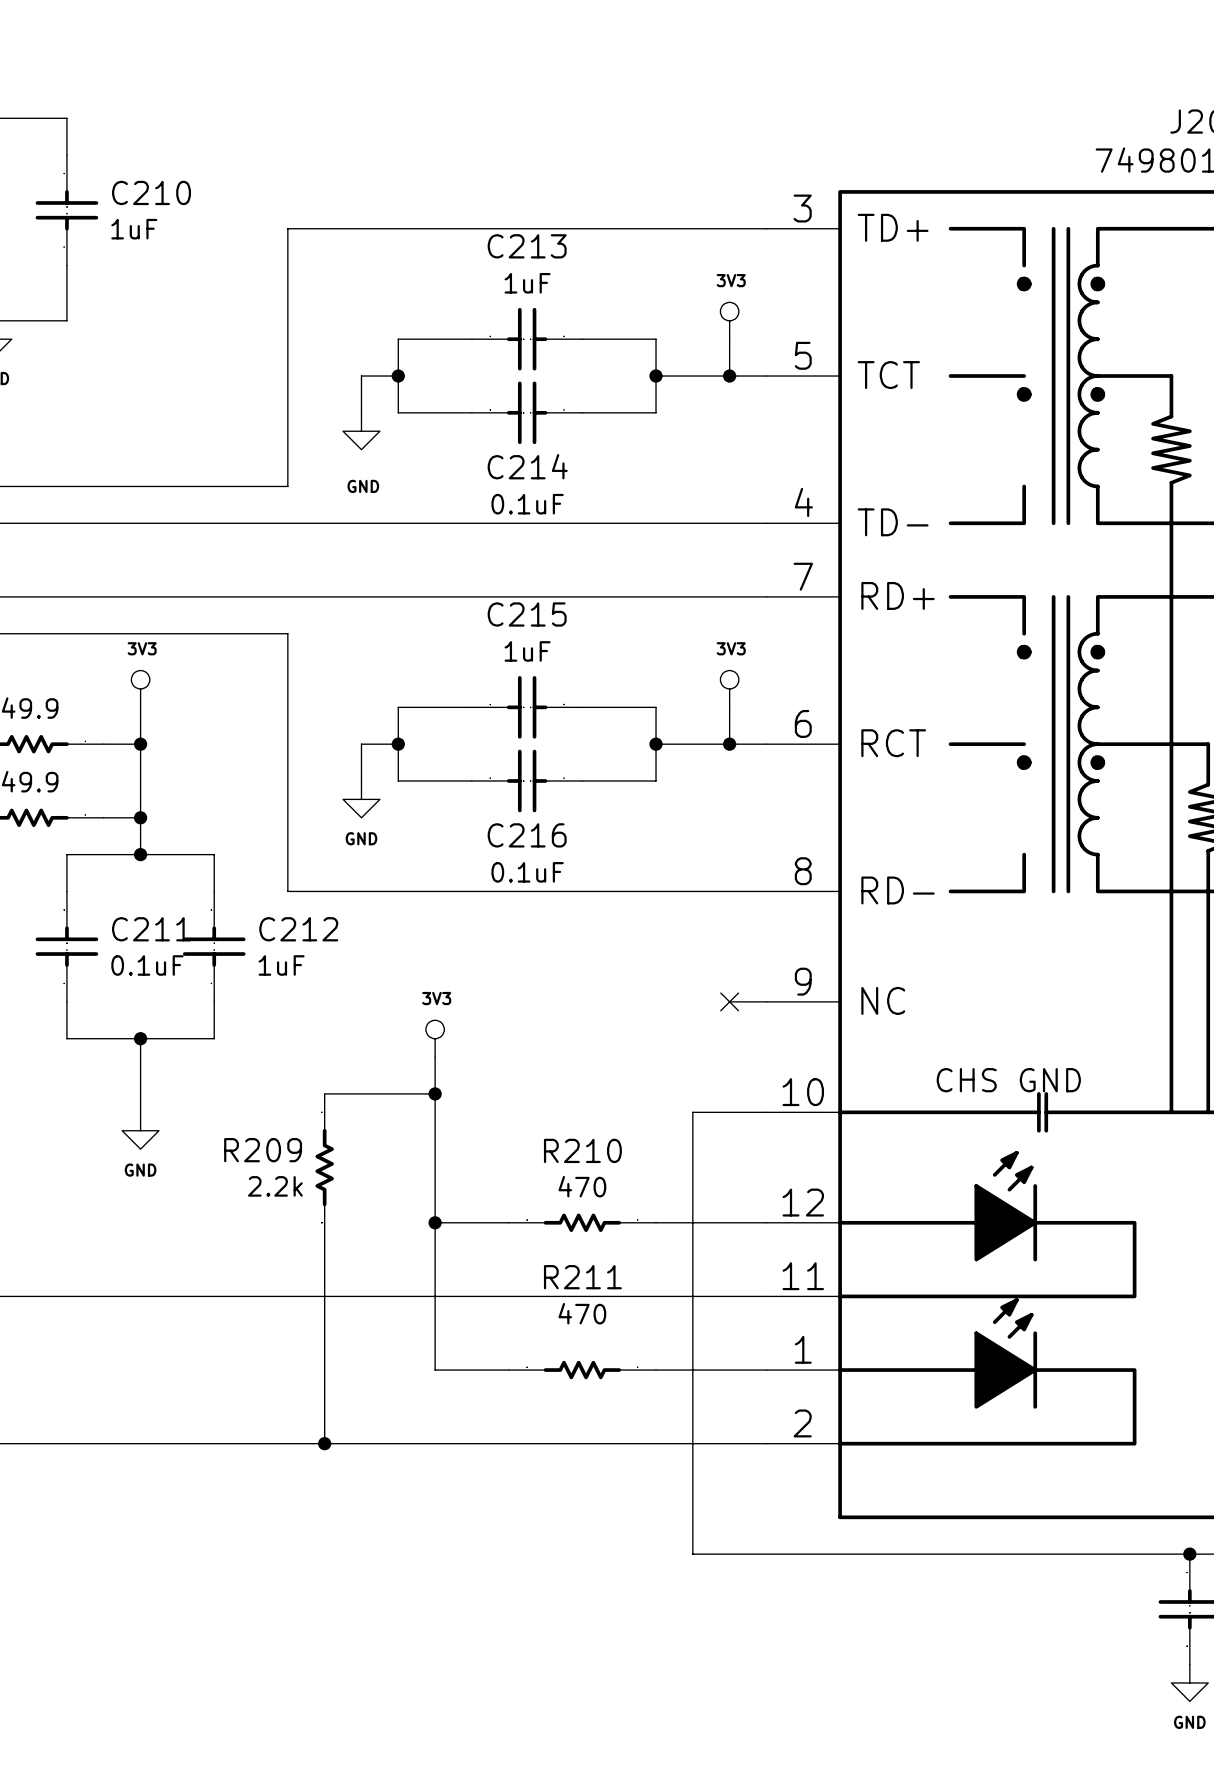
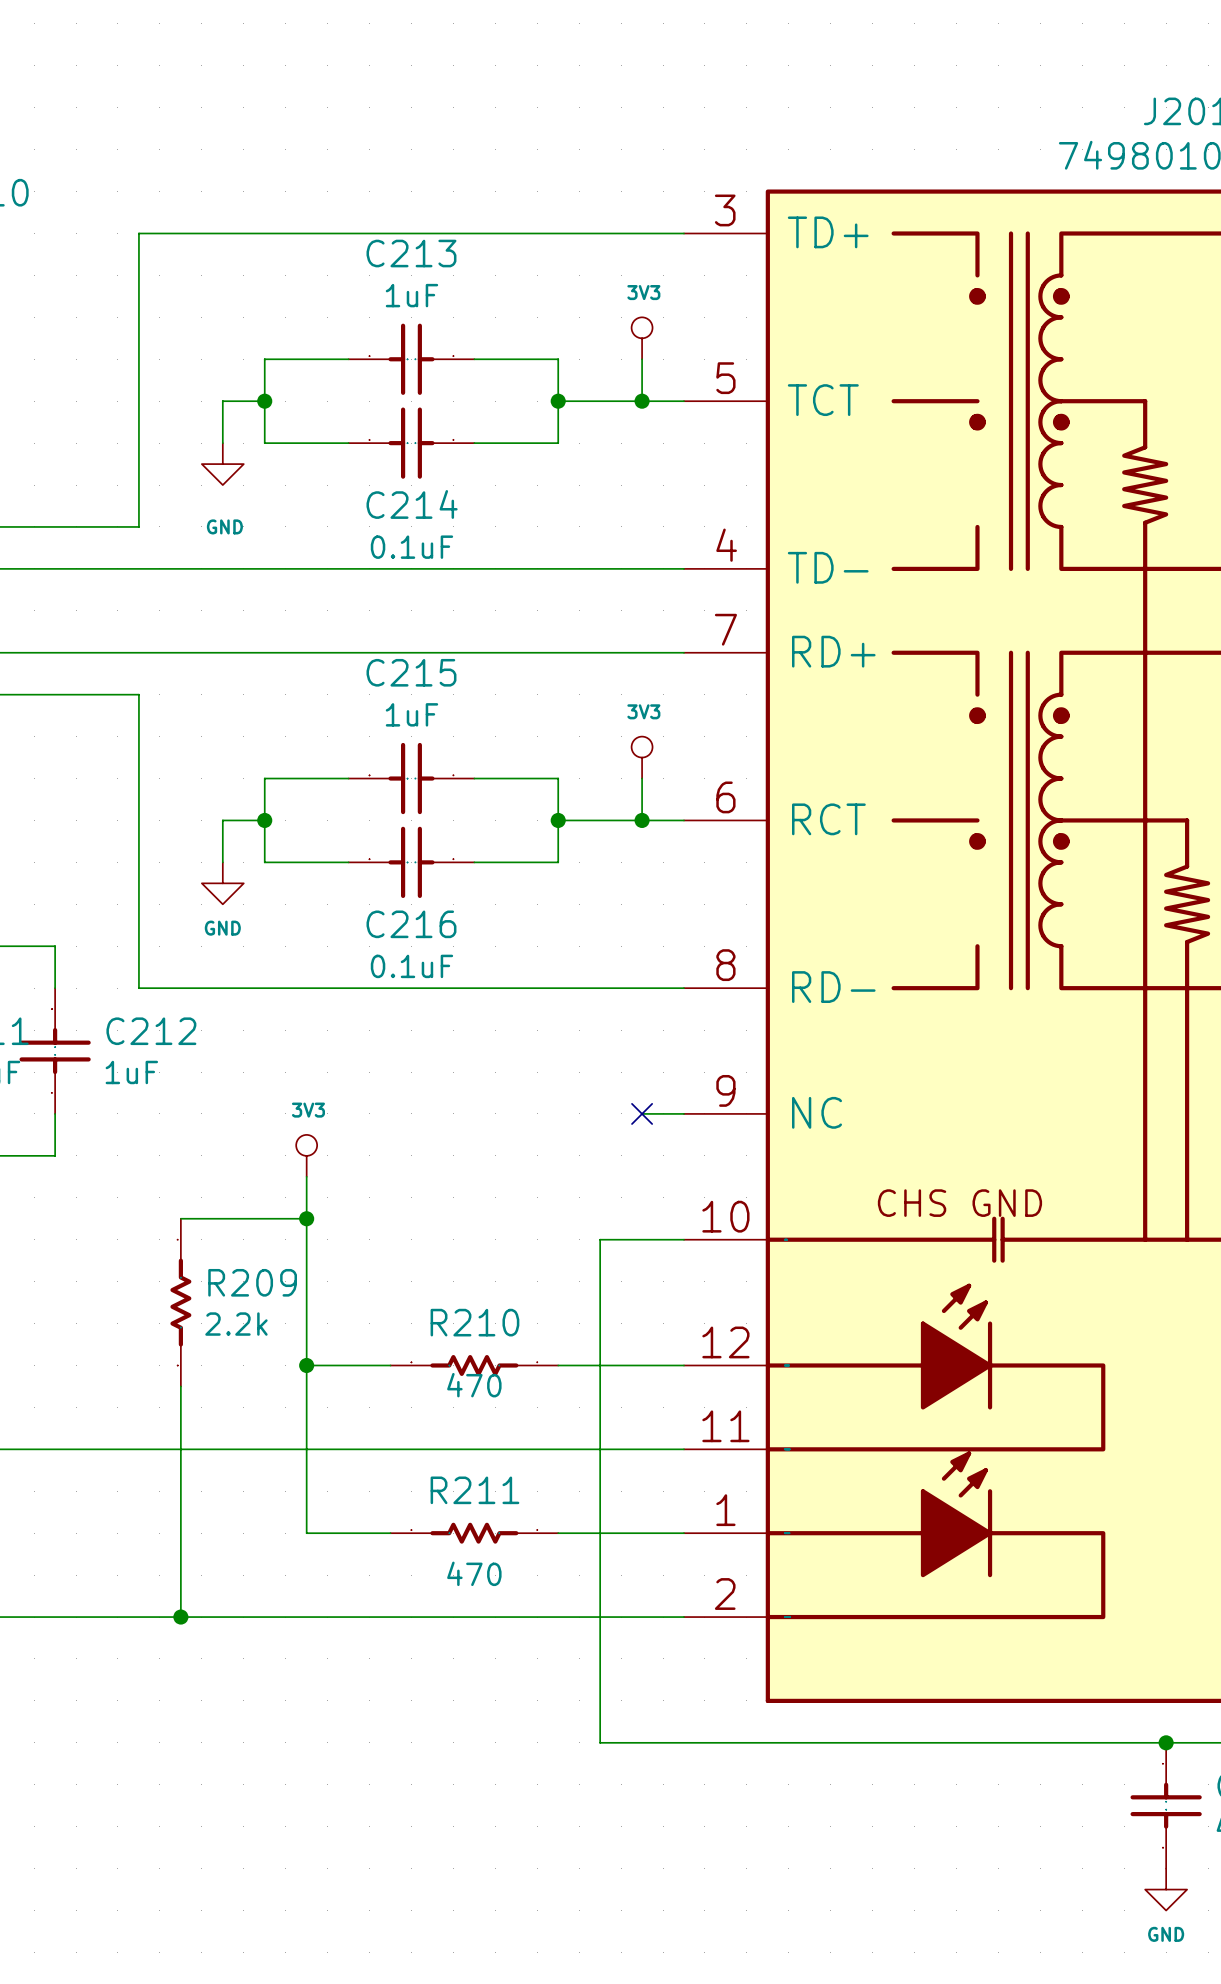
R209 name position: R209 (263, 1150) -> R209 (252, 1282)
R210 name position: R210 (582, 1150) -> R210 (474, 1322)
R209 value position: 2.2k (275, 1186) -> 2.2k (236, 1324)
R210 value position: 470 (582, 1186) -> 470 (474, 1385)
R211 name position: R211 (582, 1277) -> R211 (474, 1490)
R211 value position: 470 (582, 1313) -> 470 (474, 1573)

